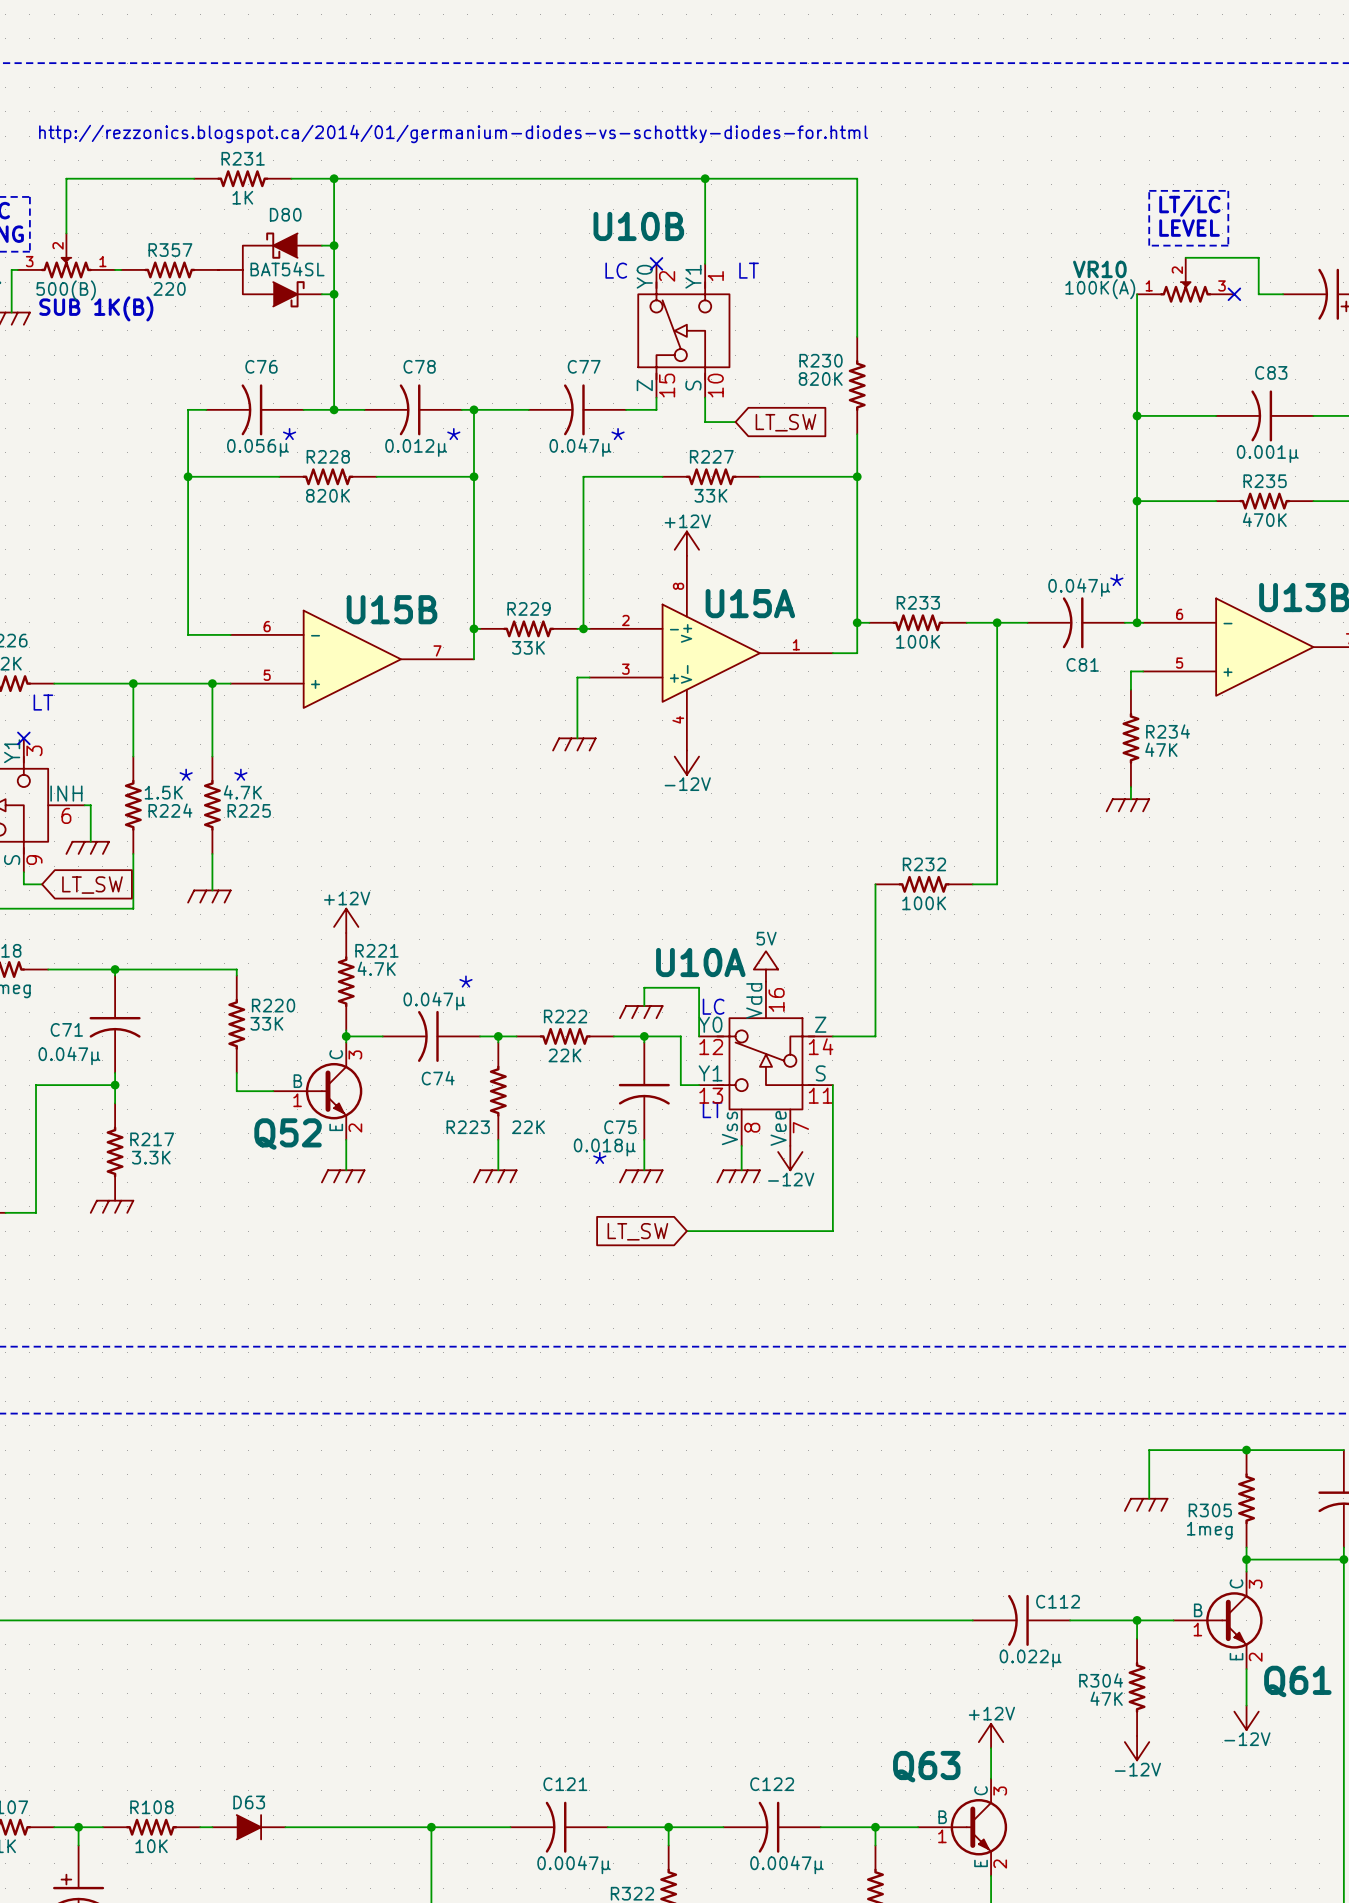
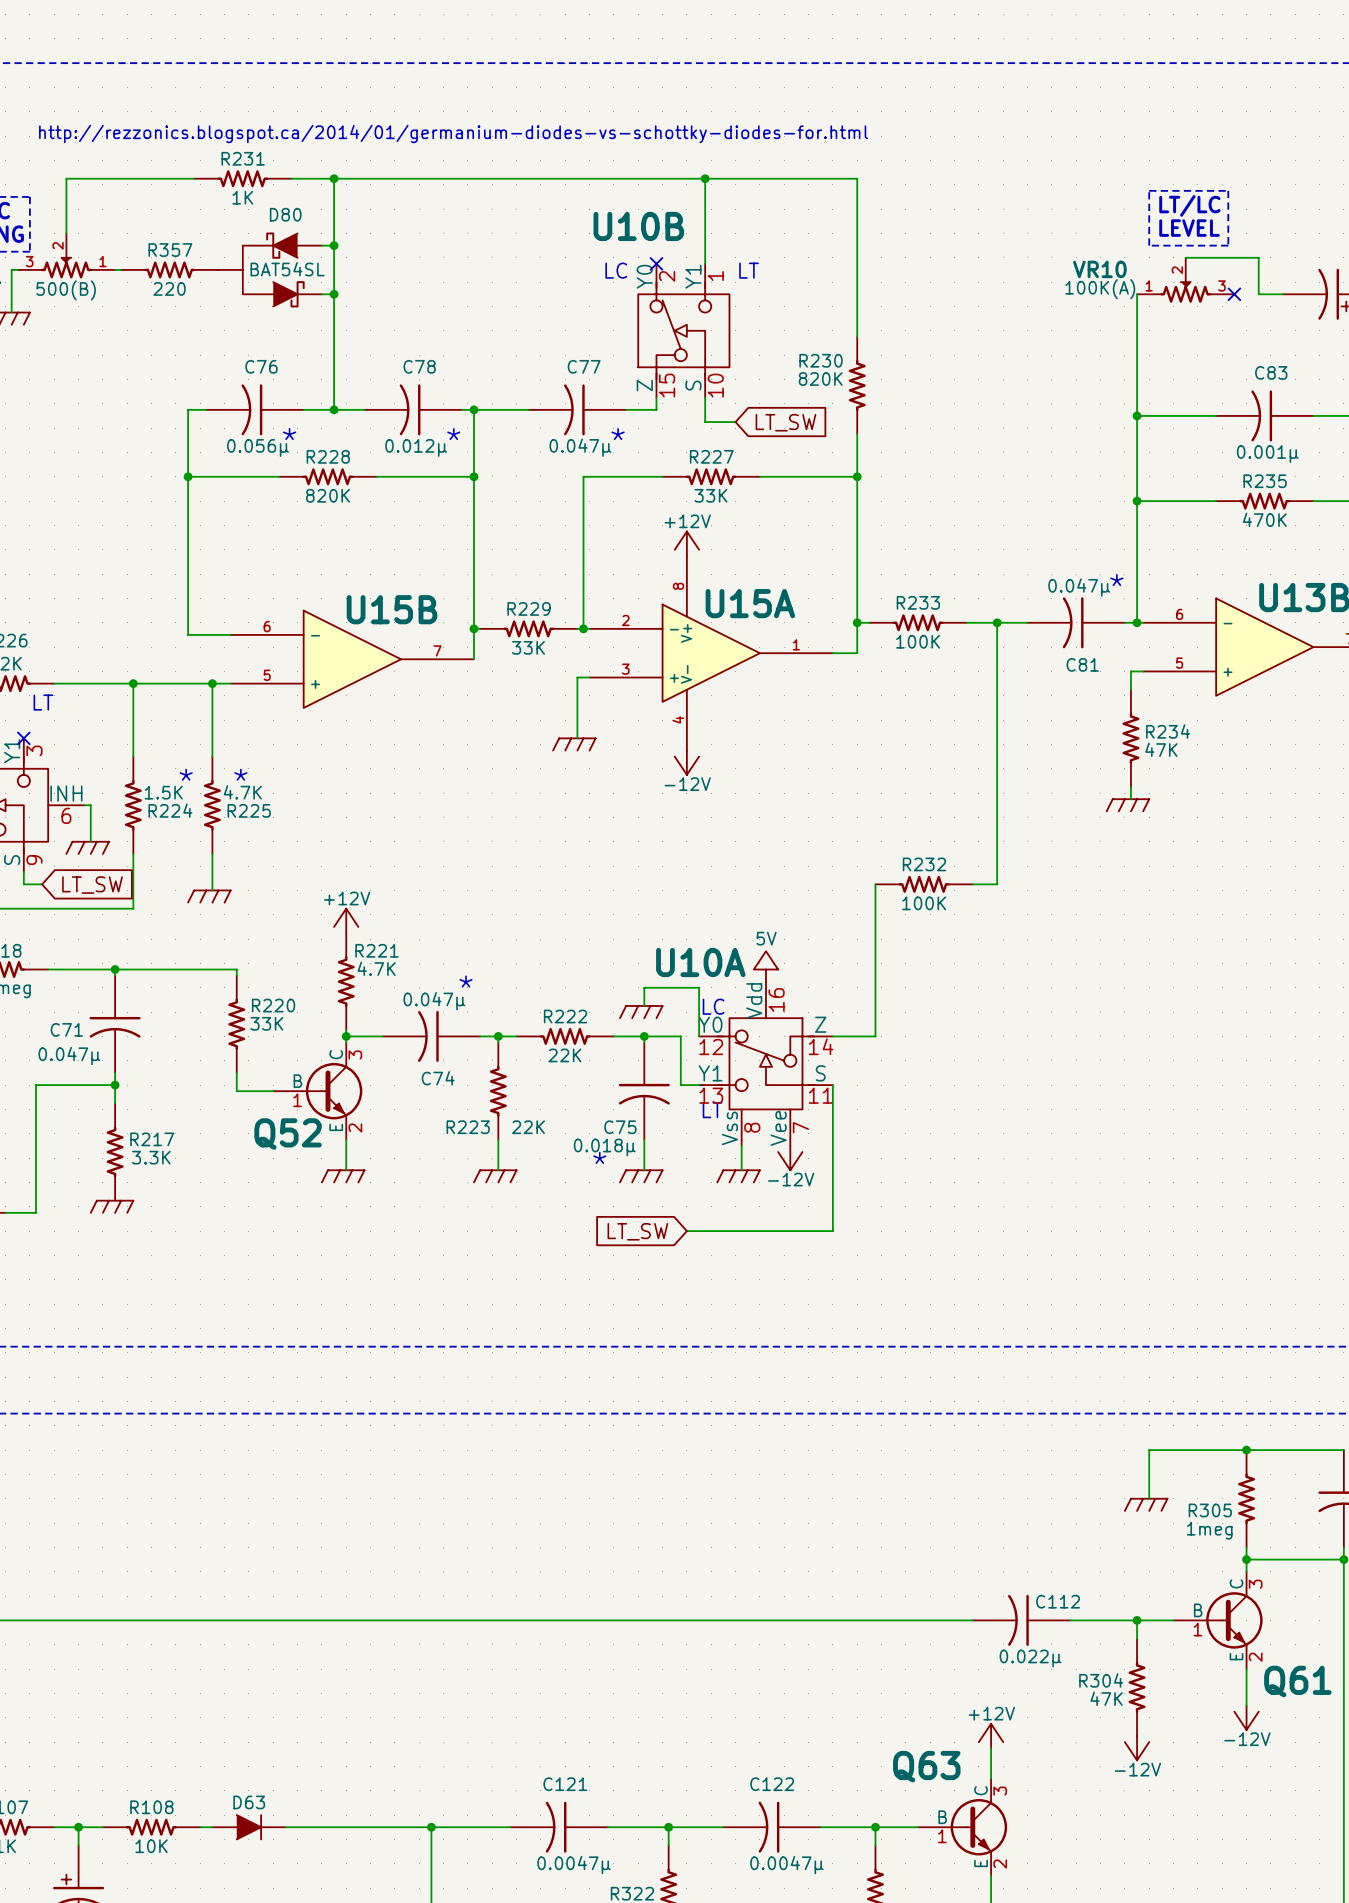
text: SUB 1K(B) (96, 308) -> none

